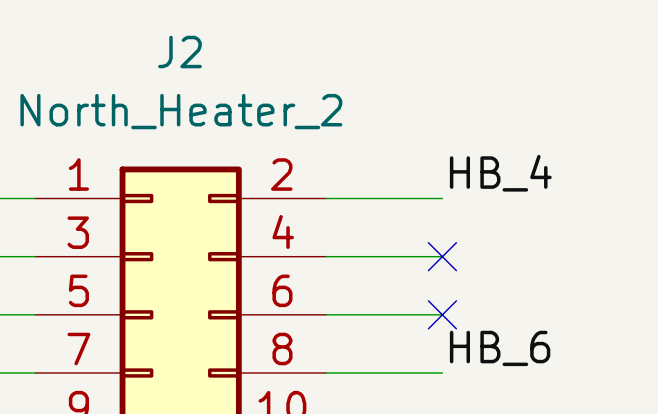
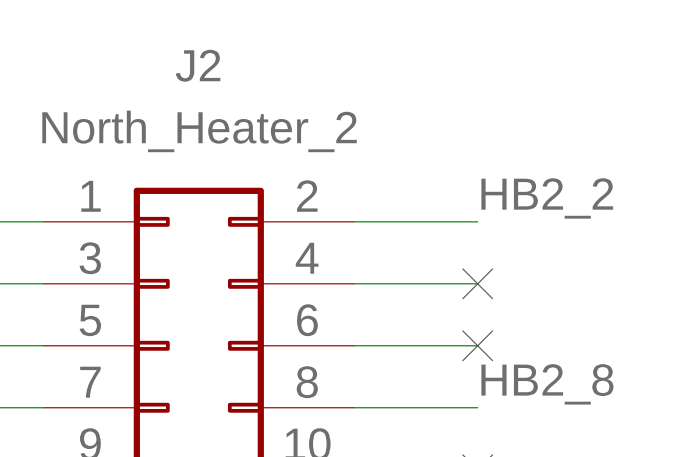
label: HB_4 (500, 173) -> HB2_2 (547, 198)
label: HB_6 (500, 348) -> HB2_8 (547, 384)

